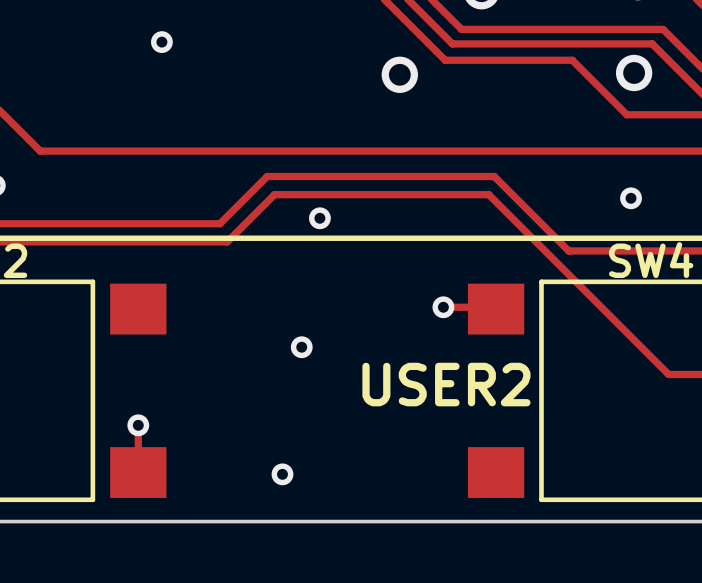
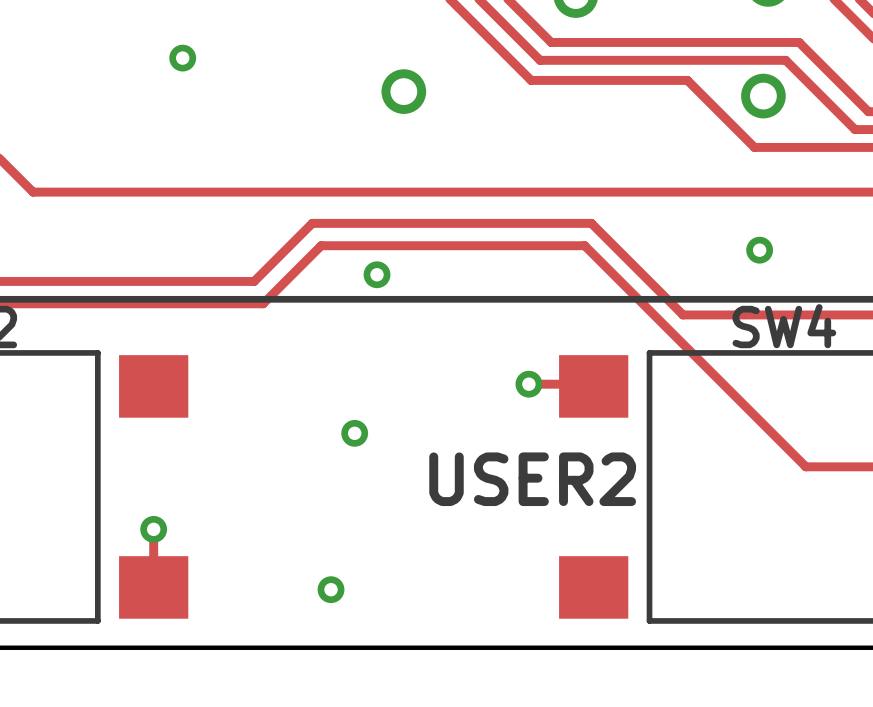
via position: (399, 74) -> (403, 91)

